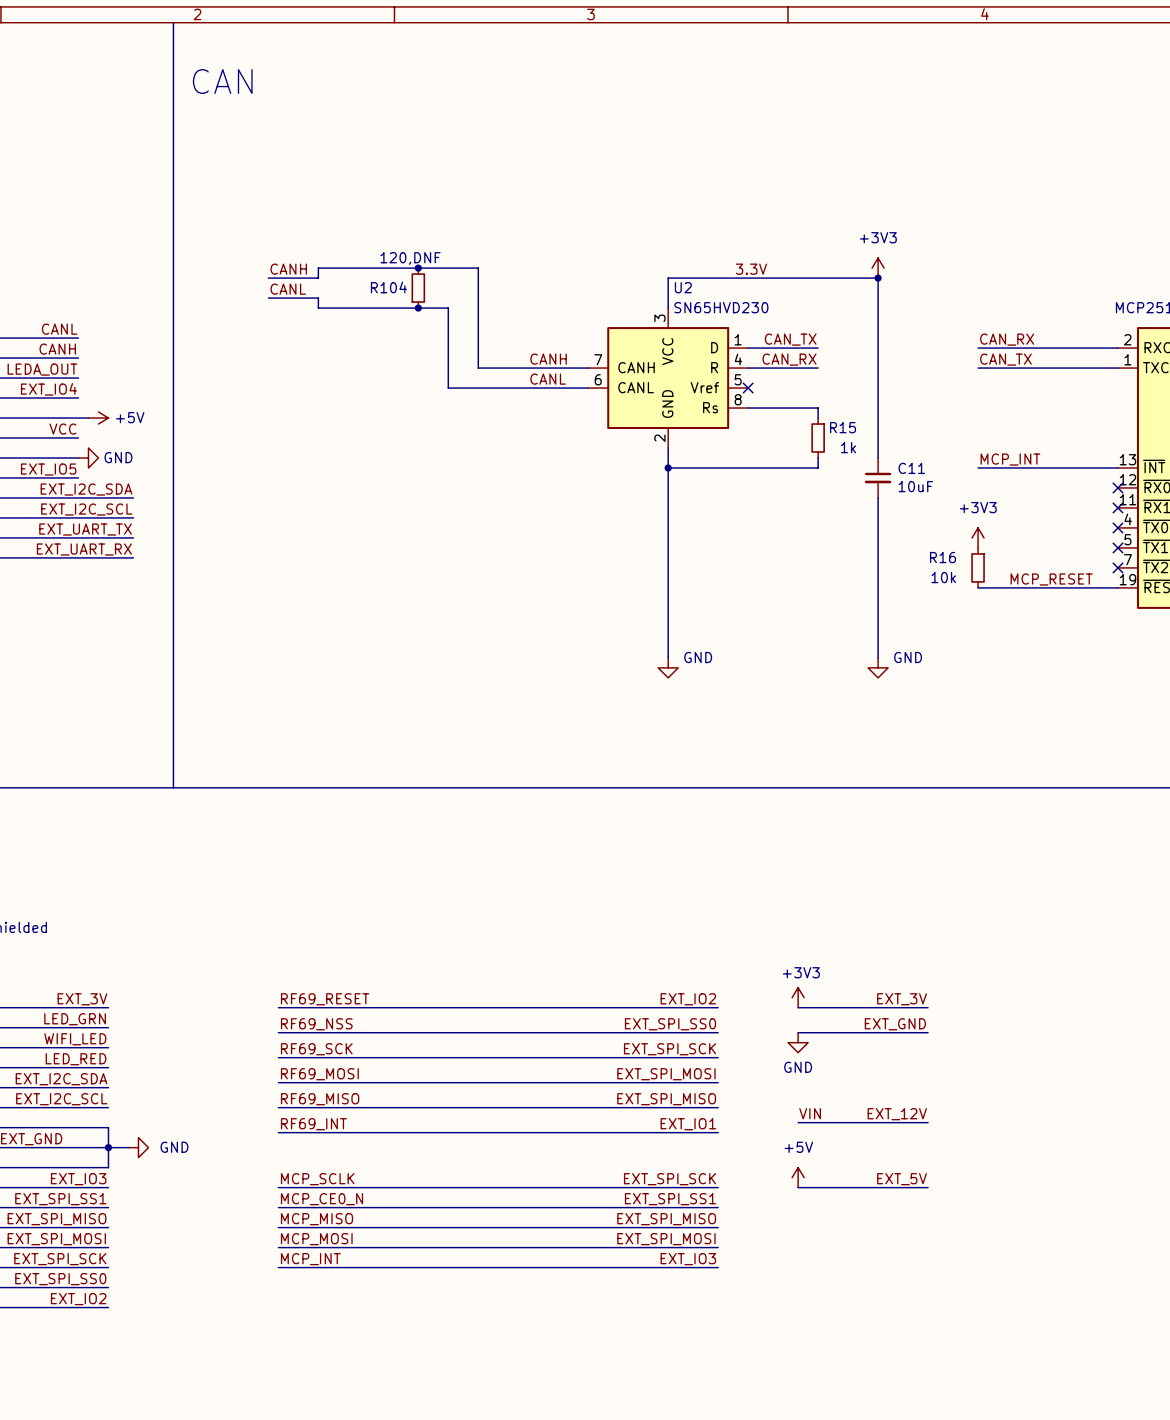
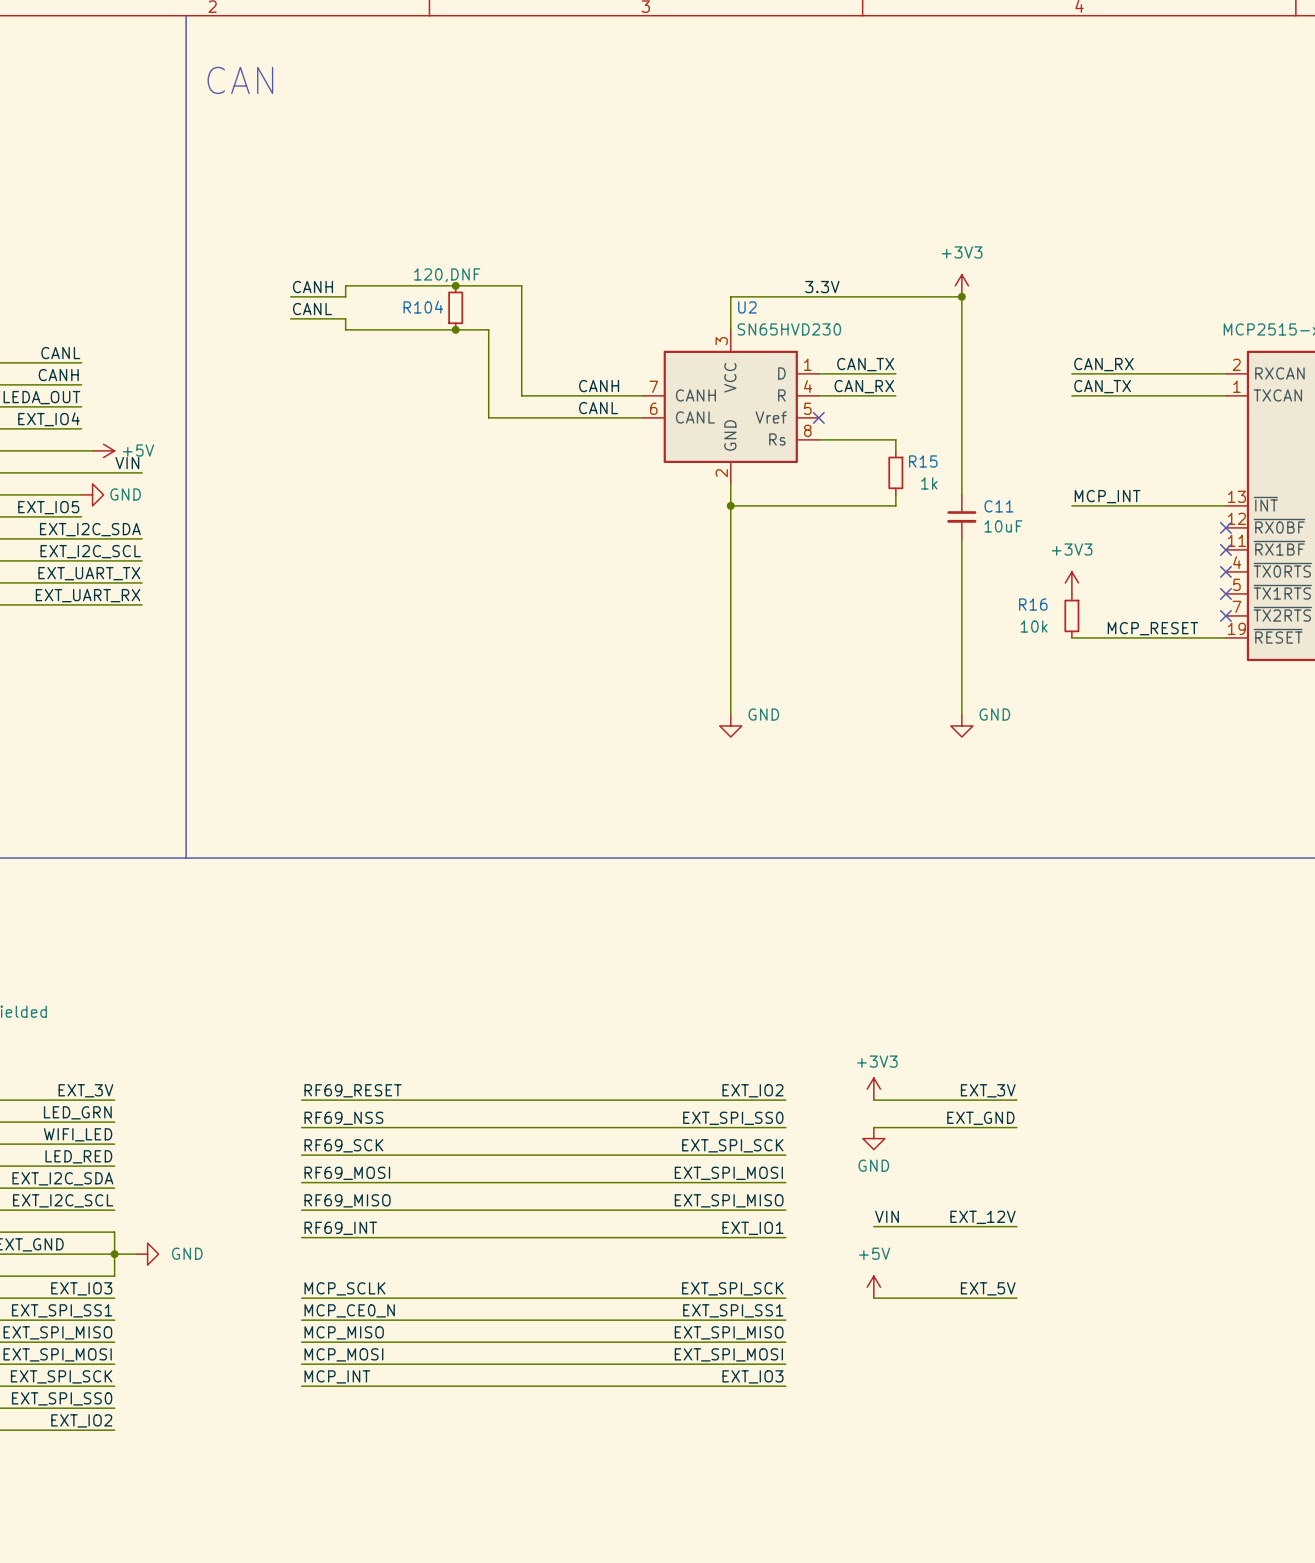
label: VCC (62, 429) -> none
label: none -> VIN (127, 463)
wire: none -> (81, 472) (142, 472)

